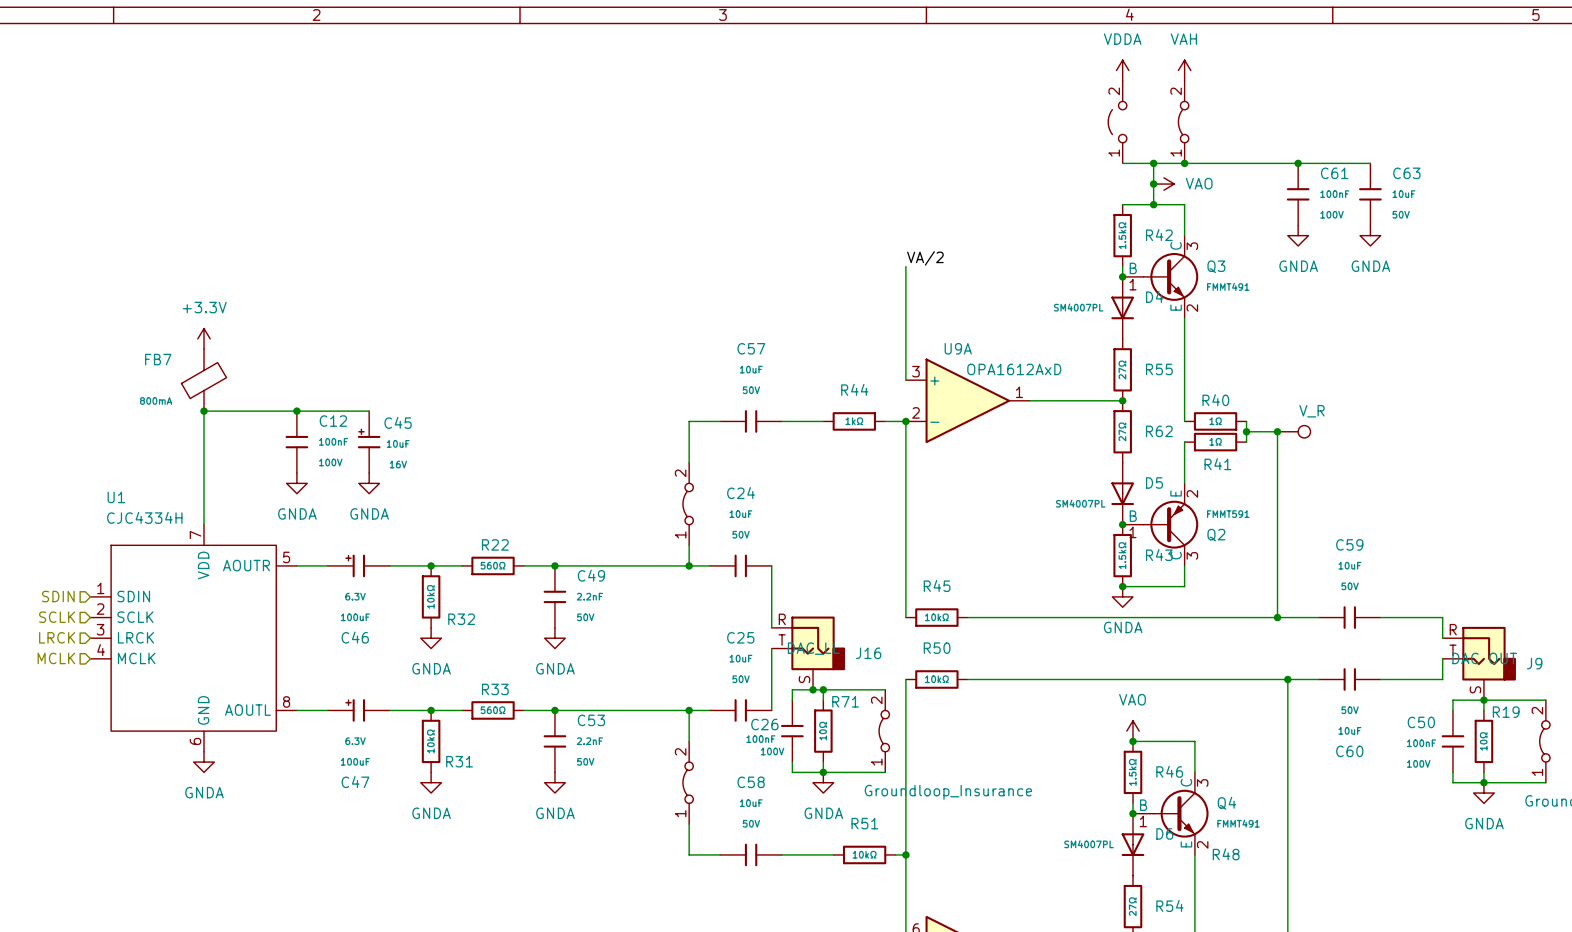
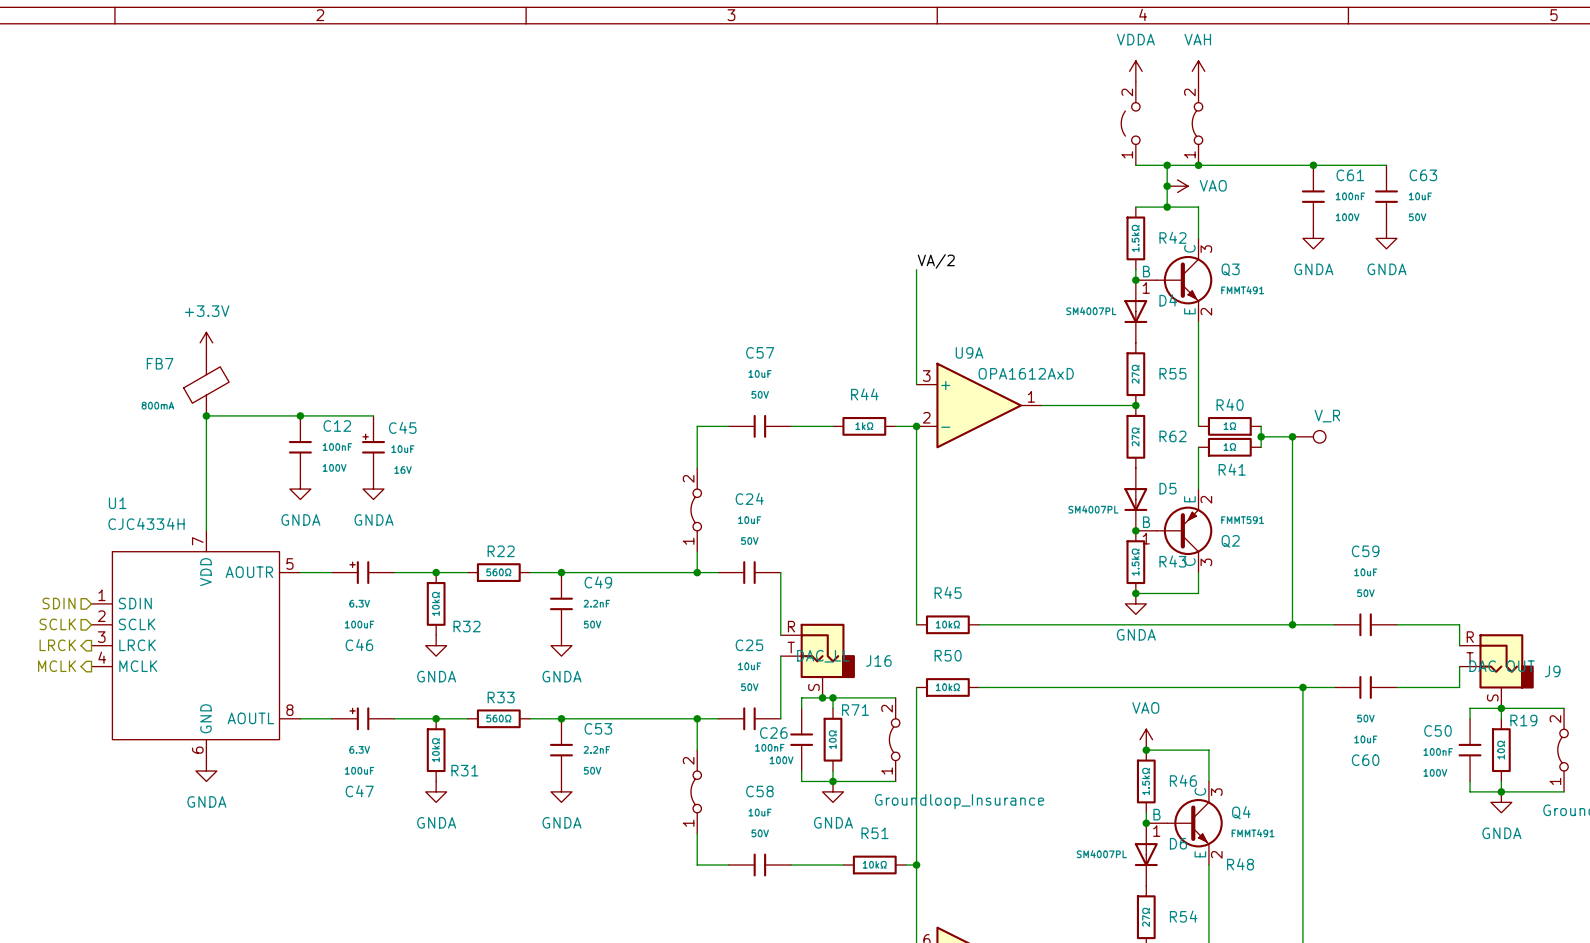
hierarchical label shape: input (57, 637) -> output (57, 645)
hierarchical label shape: input (56, 658) -> output (57, 666)

